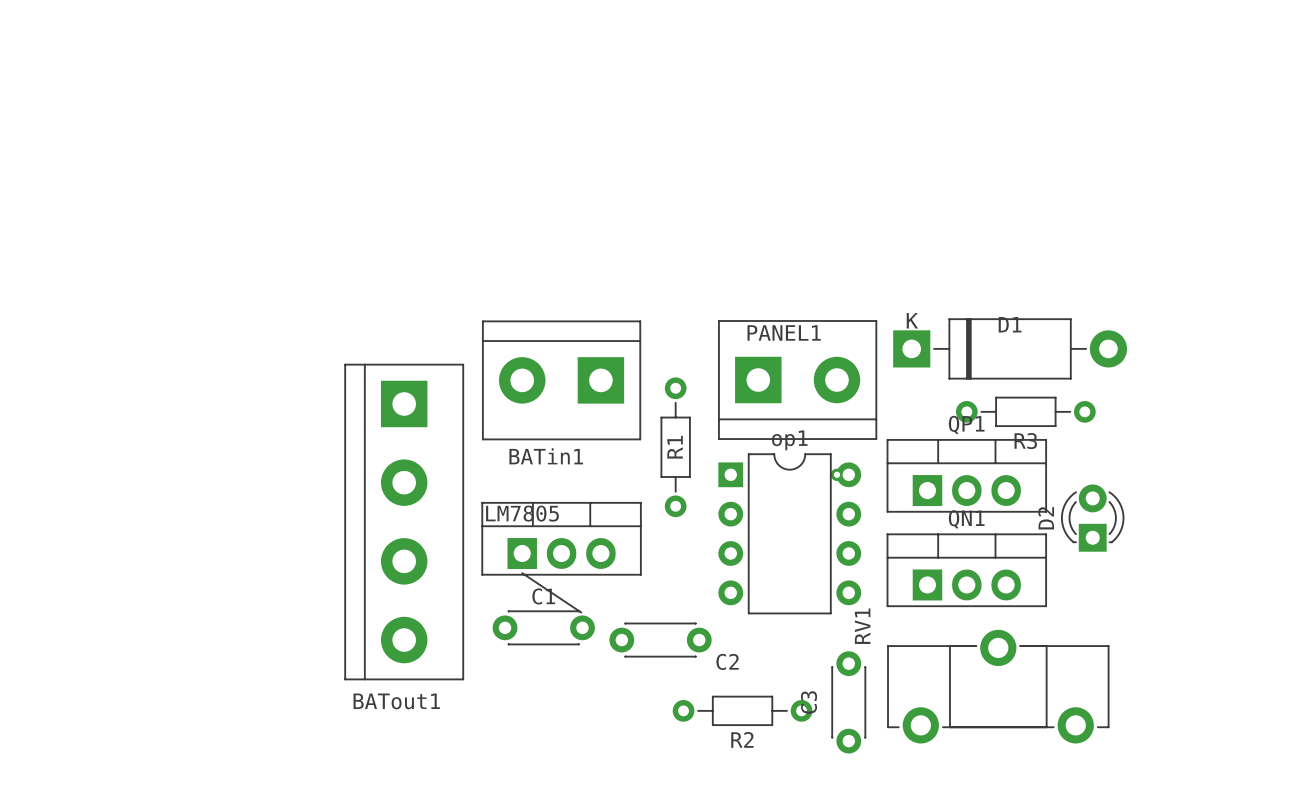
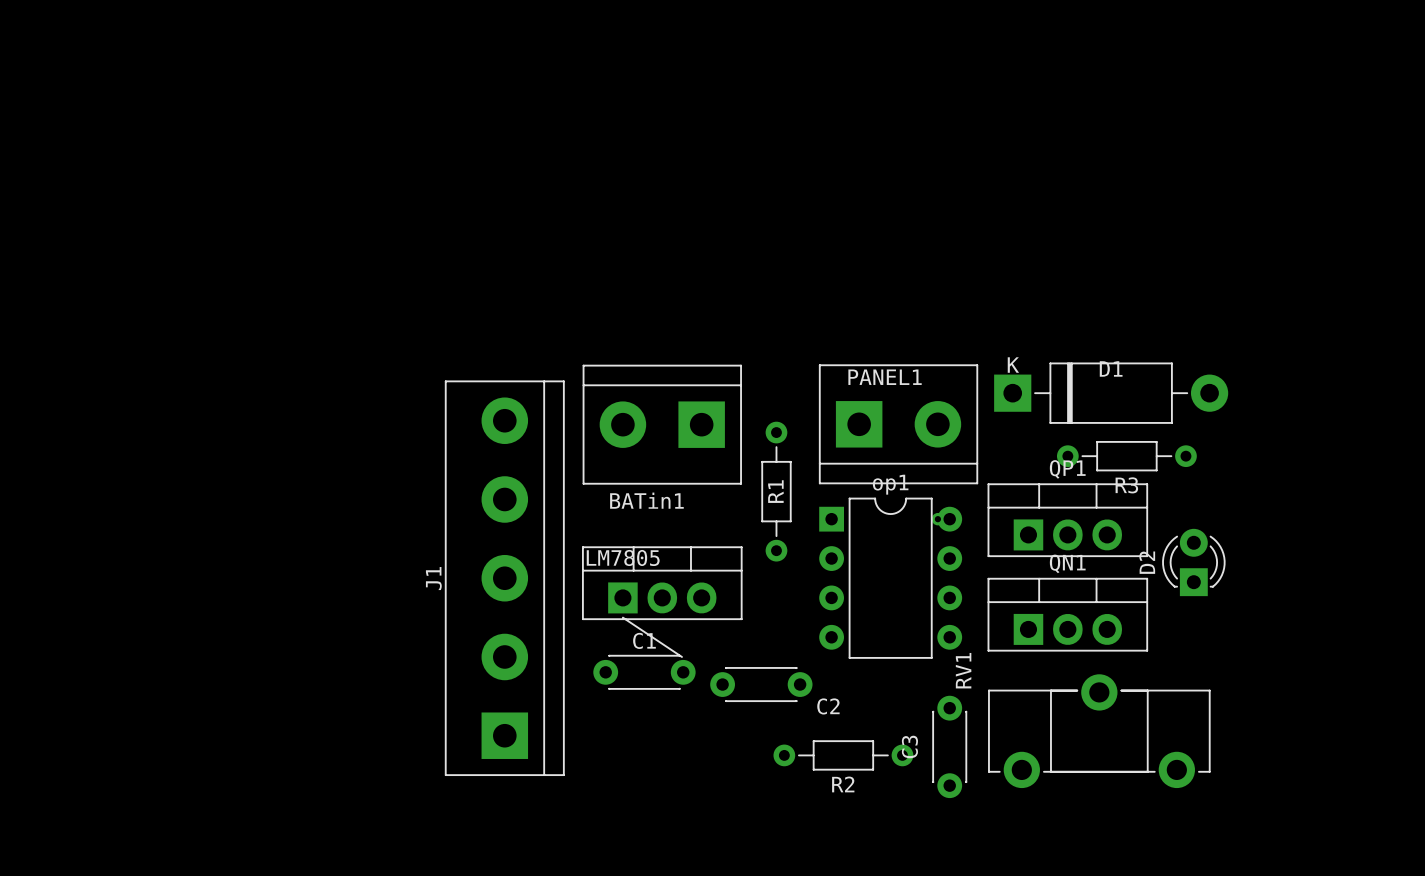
BATout1: (404, 522) -> none
J1: none -> (504, 578)

